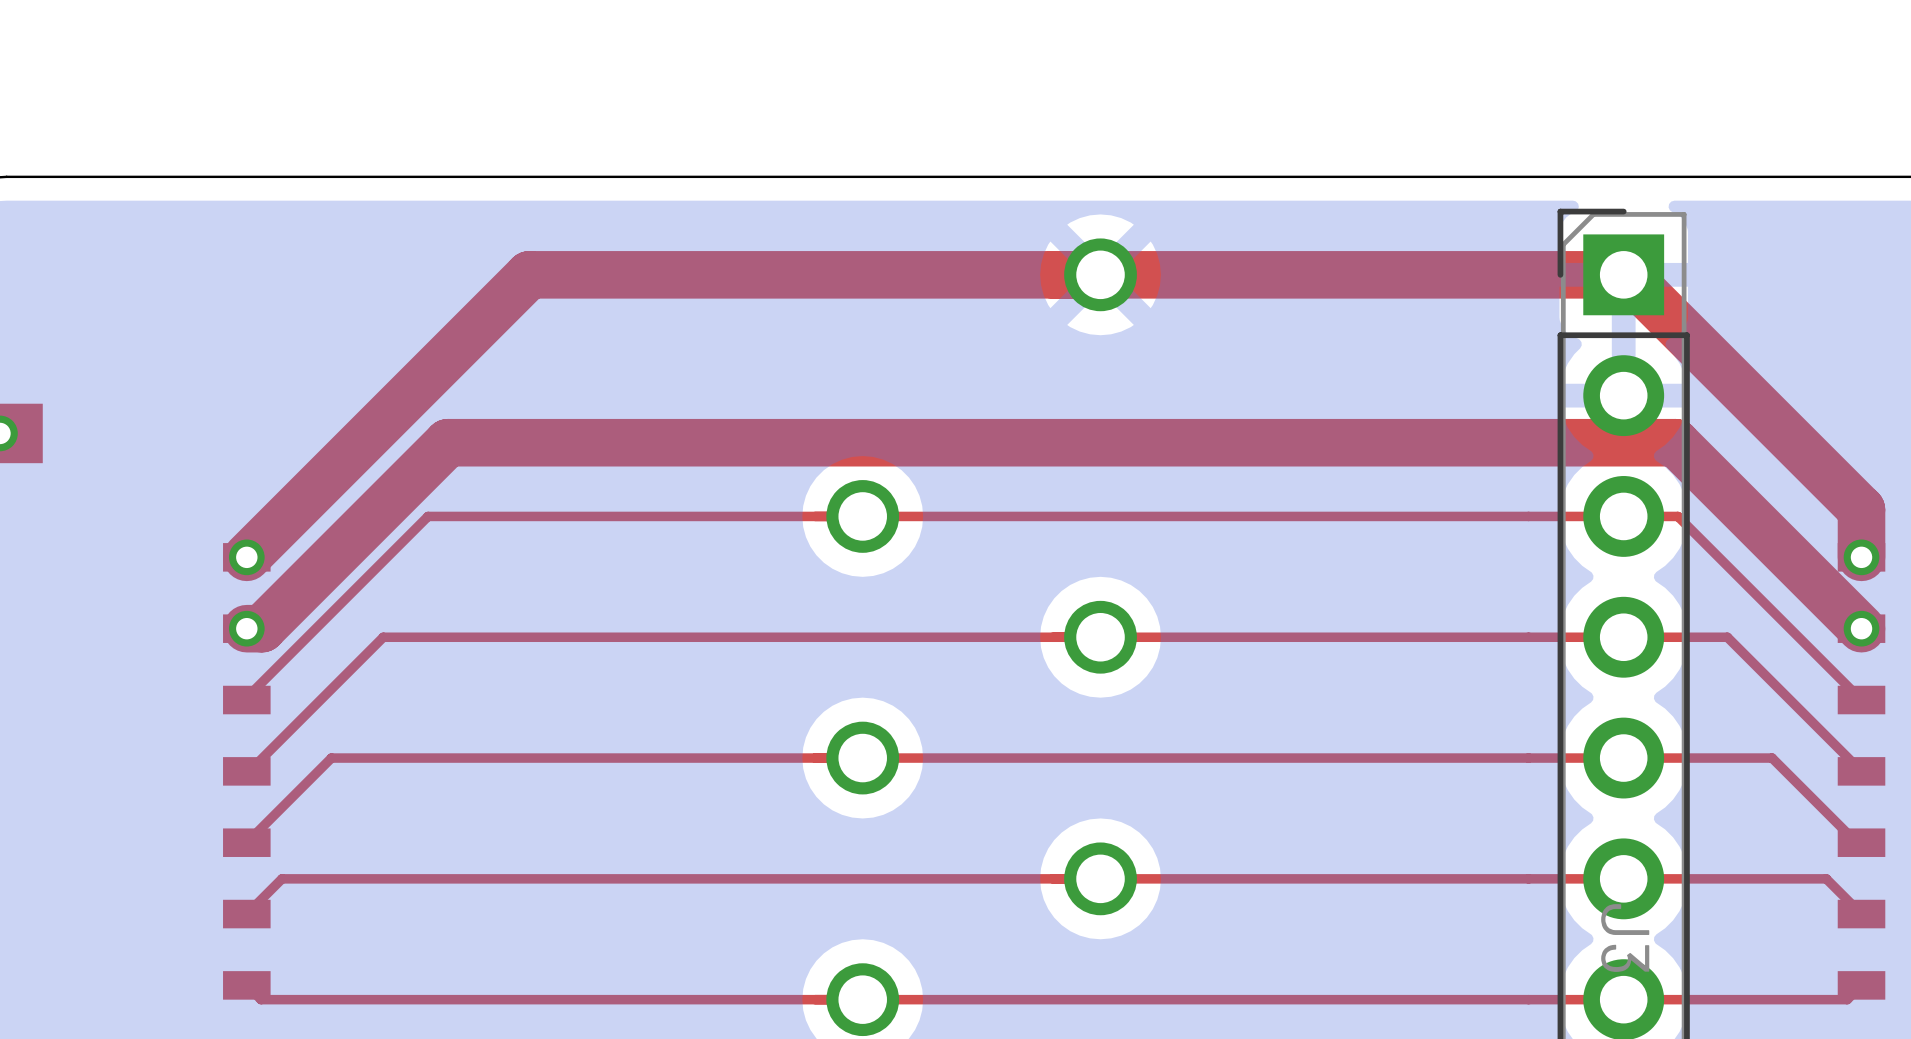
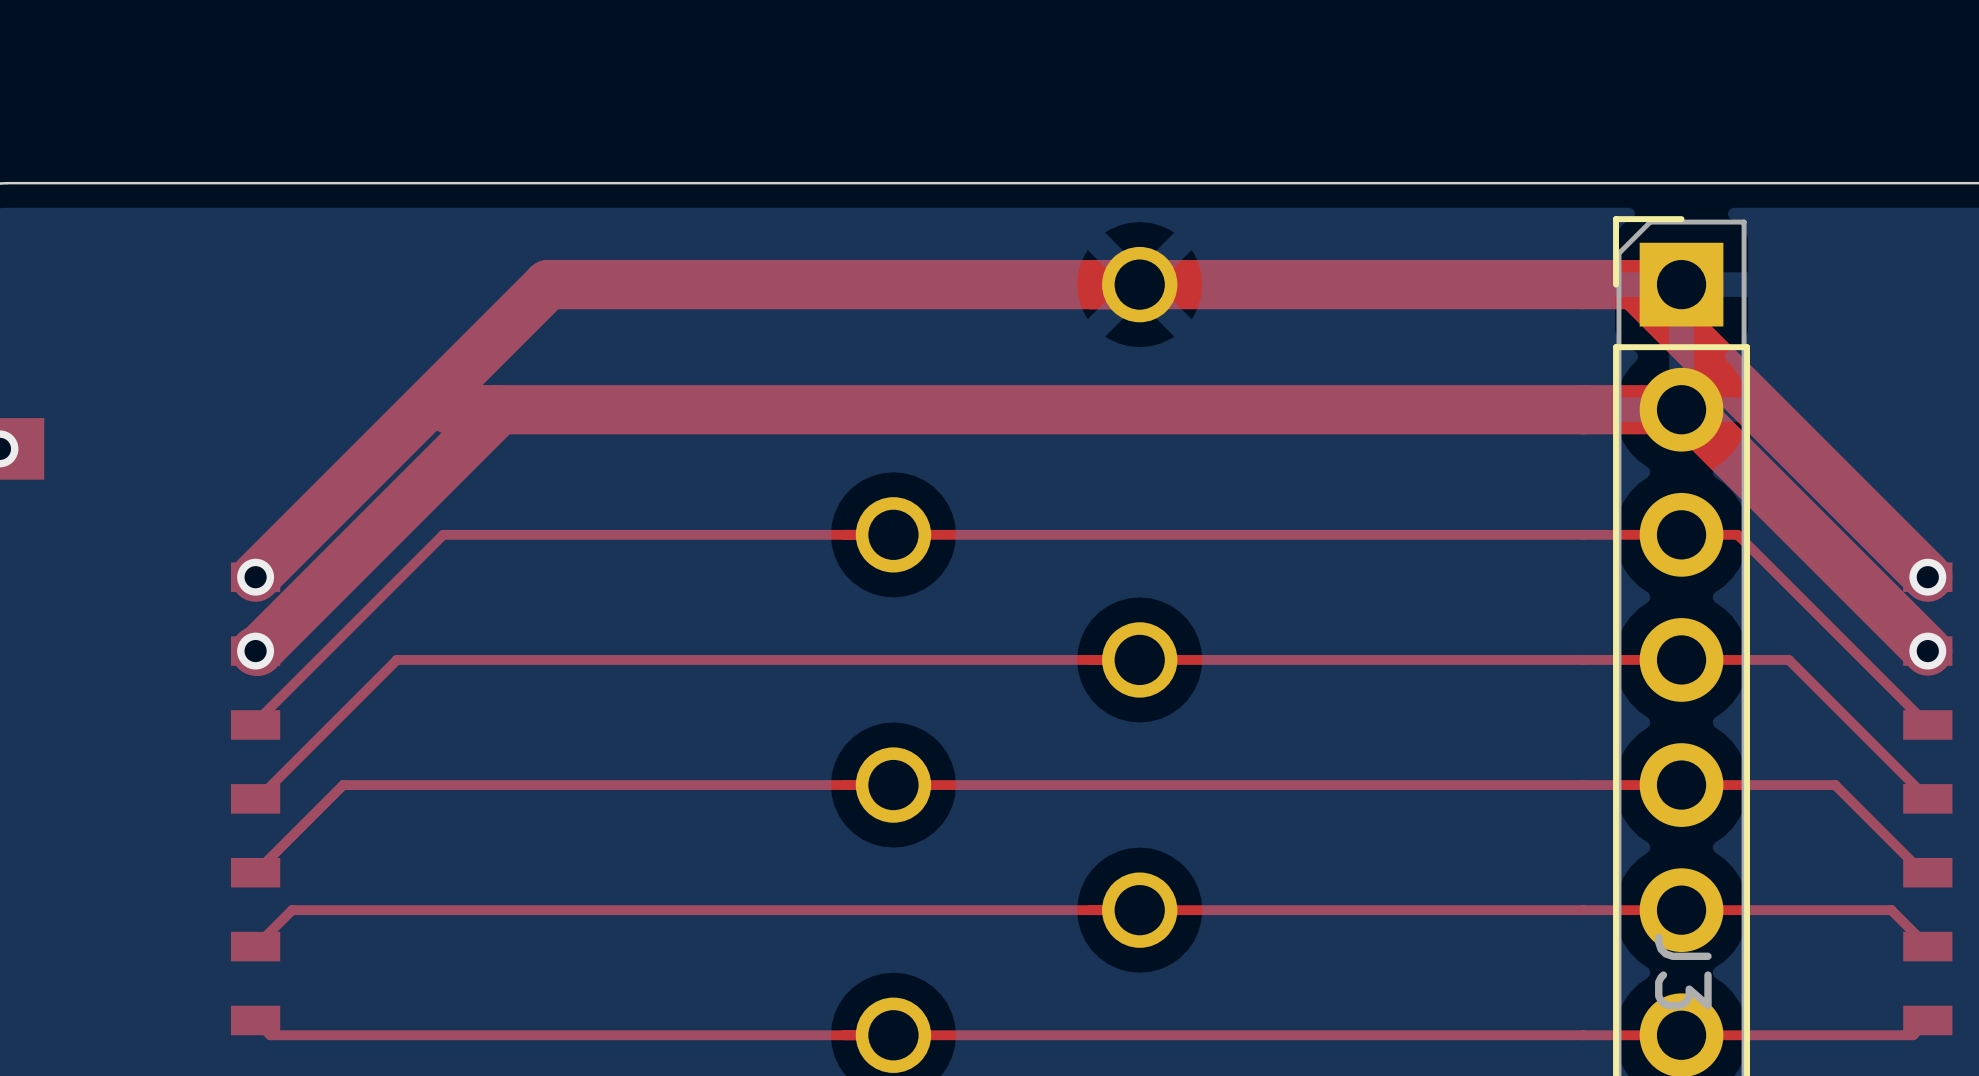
top track: (1579, 274) (1626, 274) (1861, 509) (1861, 557) -> (1635, 284) (1927, 577)
top track: none -> (499, 409) (258, 651)
top track: (1675, 442) (447, 442) (261, 628) (249, 628) -> (1735, 458) (1686, 409) (450, 409)

